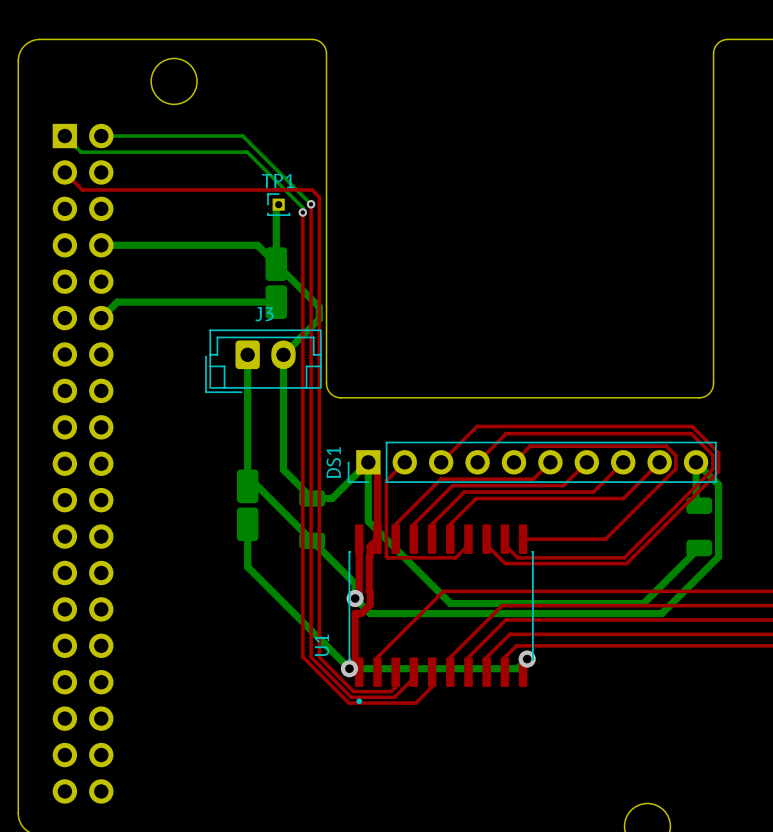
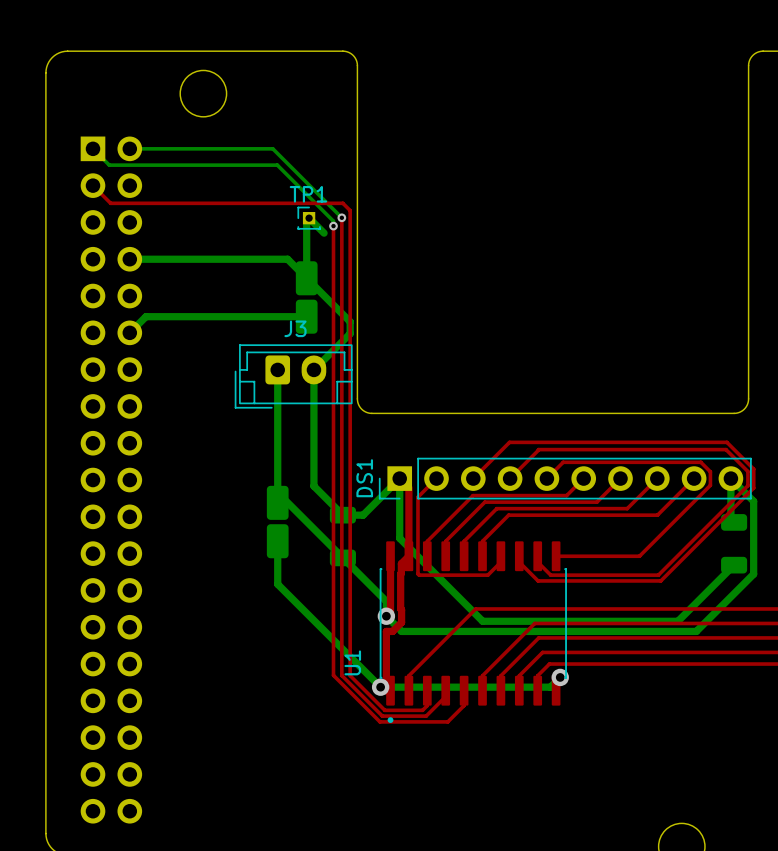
bottom track: none -> (309, 218) (324, 233)

